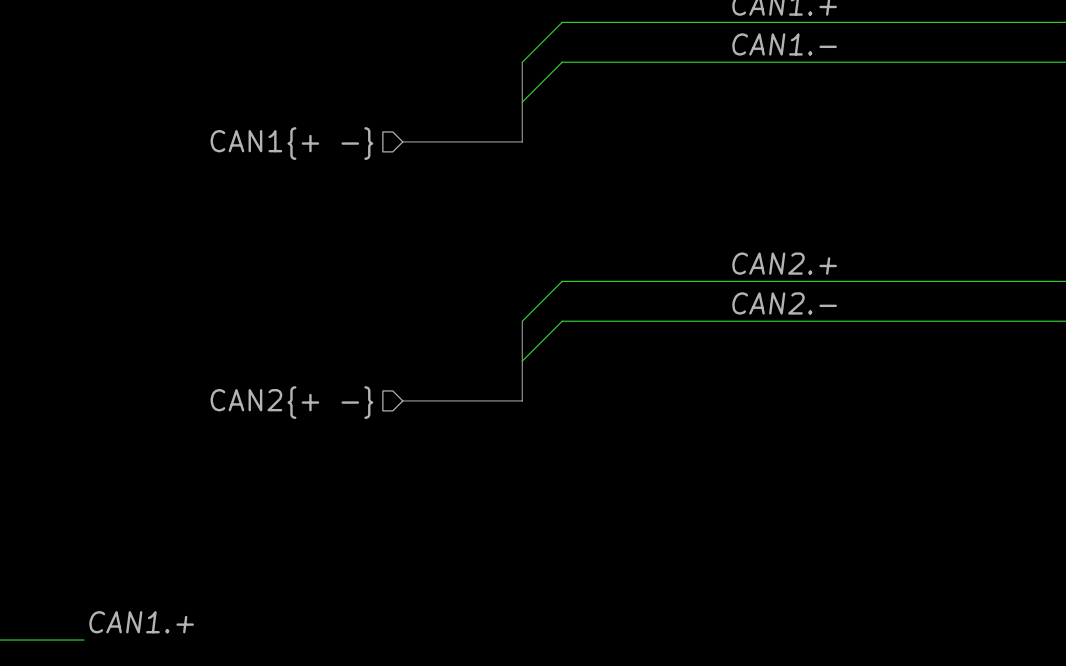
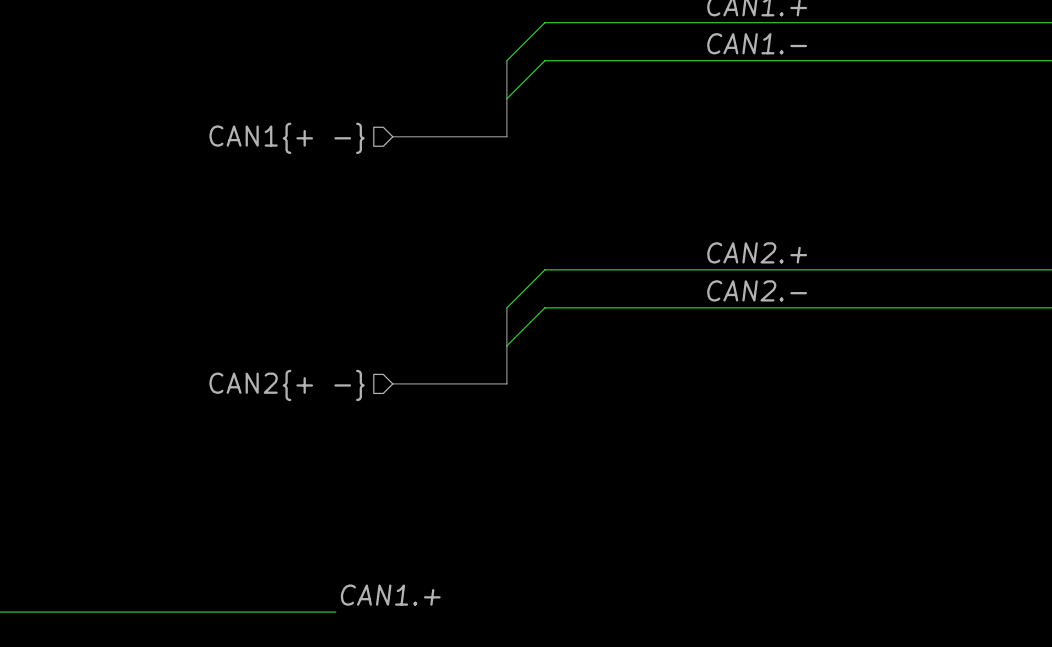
label position: CAN1.+ (141, 622) -> CAN1.+ (390, 595)
wire: none -> (88, 612) (335, 612)

